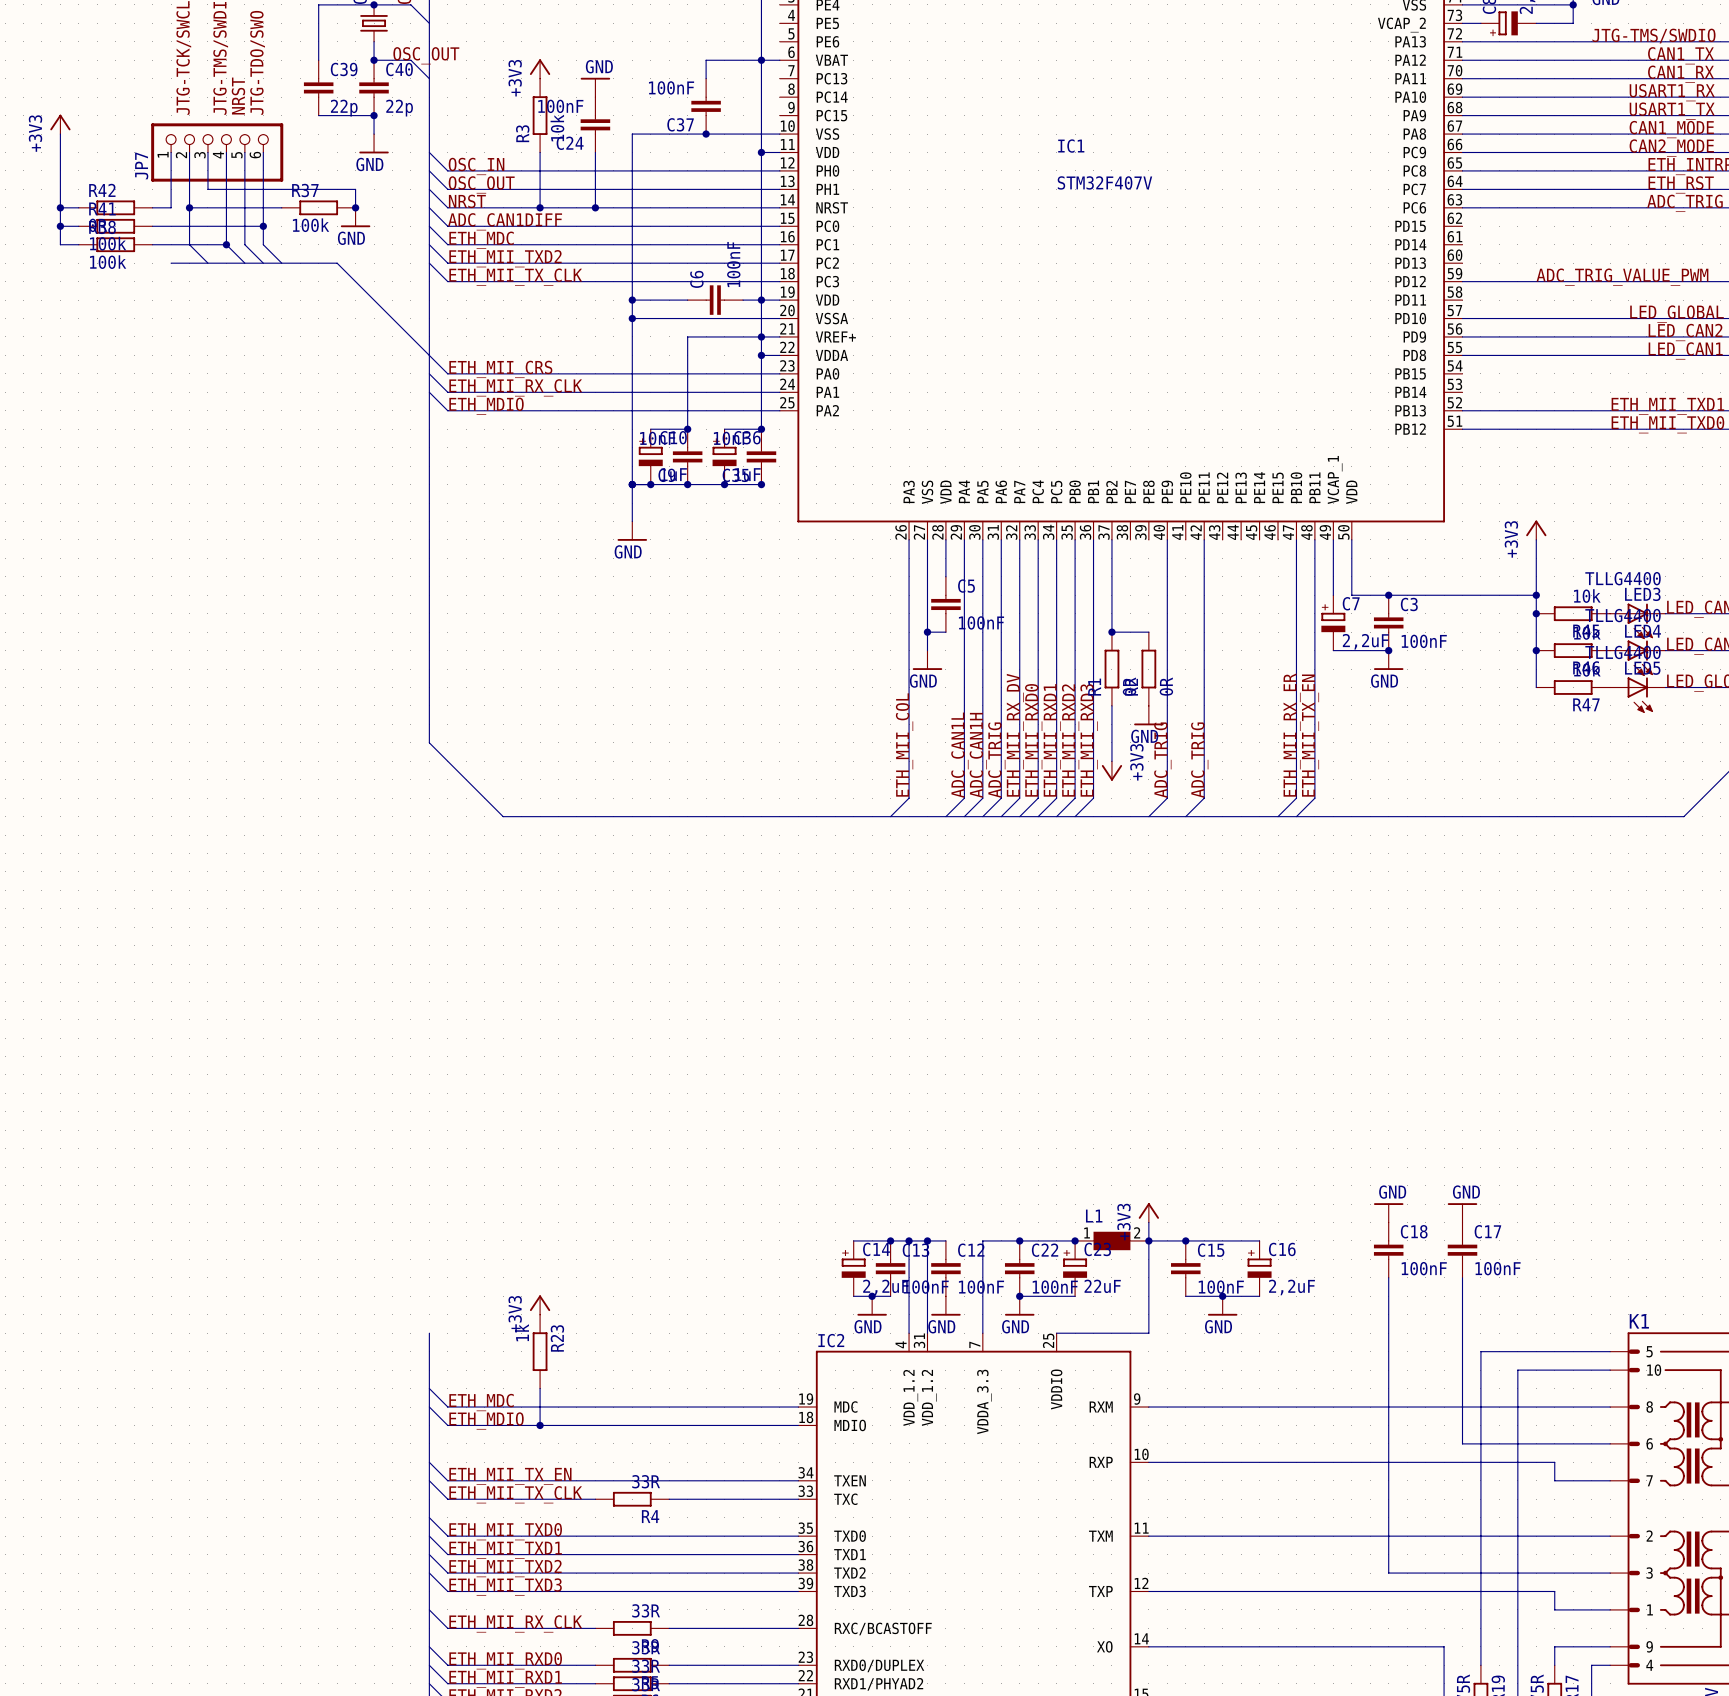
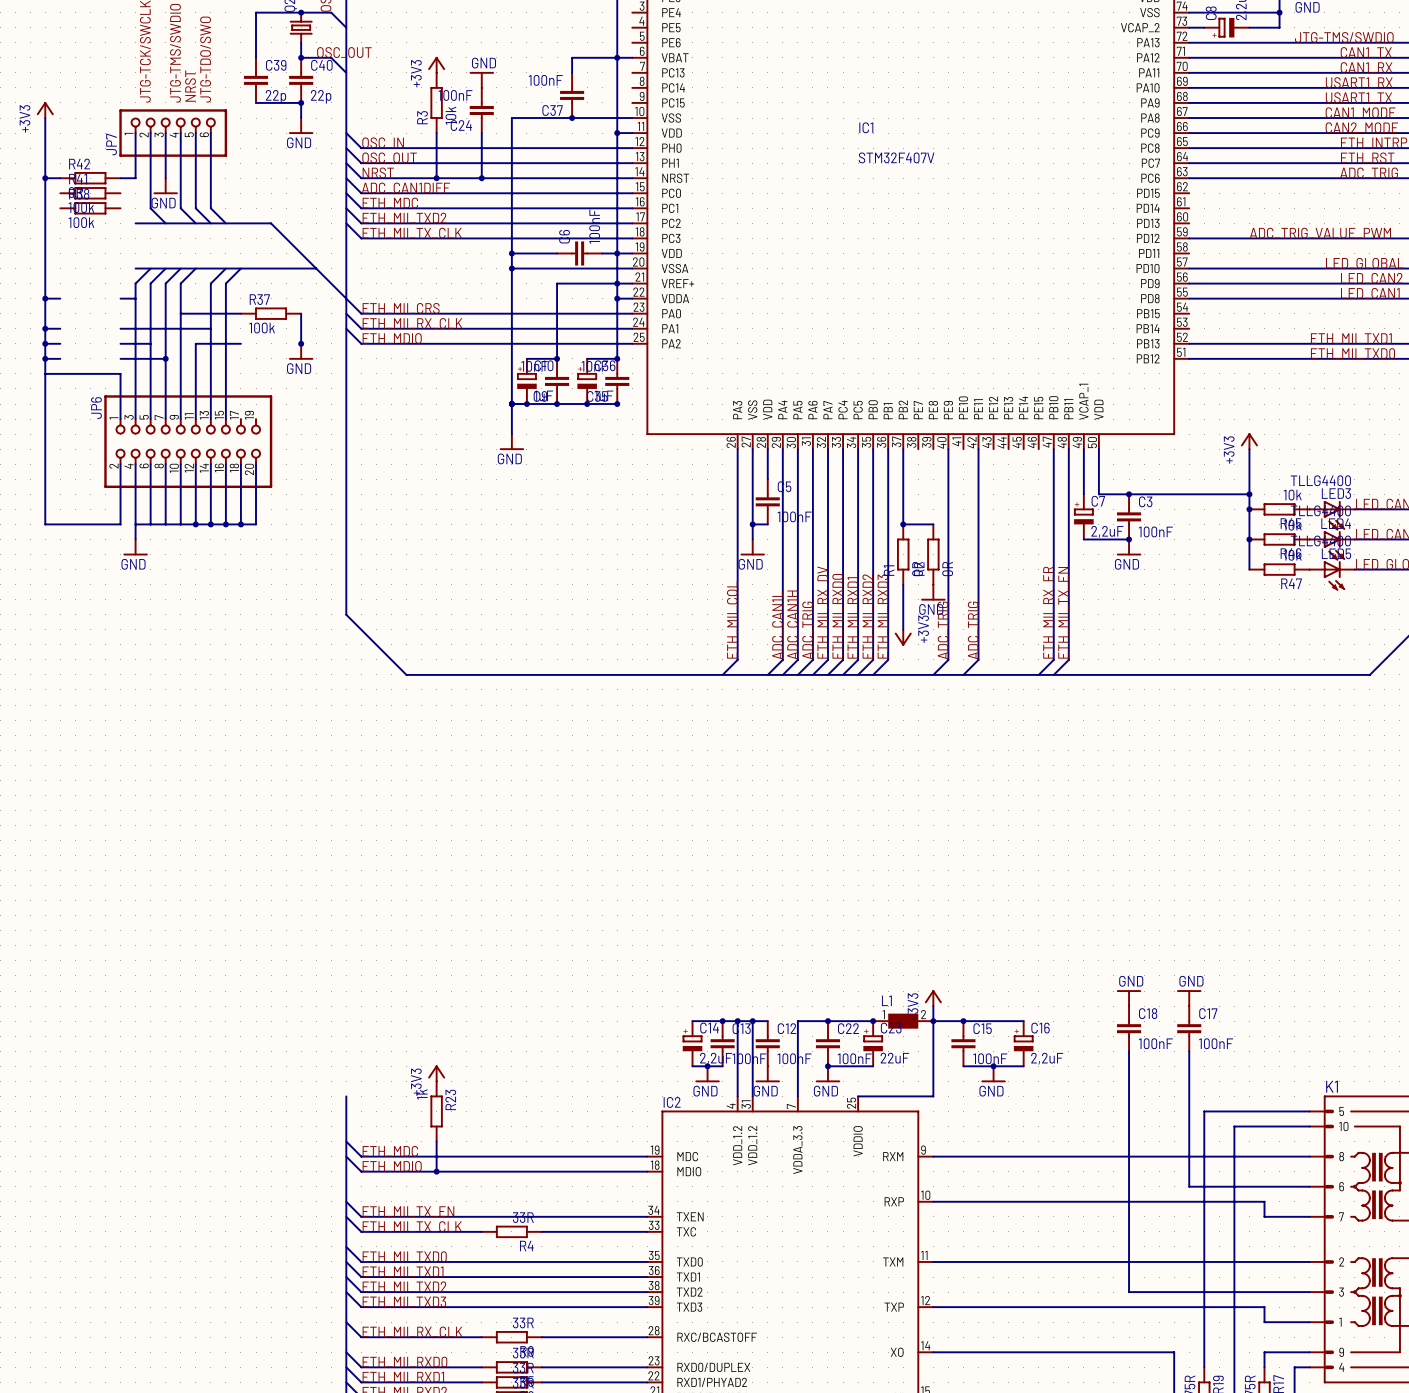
wire: (207, 189) (355, 189) (355, 207) -> (165, 163) (165, 178)
wire: (189, 207) (281, 207) -> none
junction: (189, 207) -> none
R37 position: (318, 207) -> (271, 313)
junction: (355, 207) -> none
power symbol: none -> GND (165, 186)
power symbol: GND (355, 217) -> none
wire: (60, 226) (78, 226) -> (45, 328) (60, 328)
junction: (60, 226) -> none
wire: (152, 226) (263, 226) -> (120, 328) (210, 328)
junction: (263, 226) -> none
wire: (60, 244) (78, 244) -> (45, 208) (45, 524) (120, 524) (120, 464)
wire: (152, 244) (226, 244) -> (180, 313) (240, 313)
junction: (226, 244) -> none
bus: none -> (135, 268) (316, 268)
wire: none -> (150, 268) (135, 283) (135, 419)
wire: none -> (165, 268) (150, 283) (150, 419)
wire: none -> (180, 268) (165, 283) (165, 419)
wire: none -> (195, 268) (180, 283) (180, 419)
wire: none -> (225, 268) (210, 283) (210, 419)
wire: none -> (240, 268) (225, 283) (225, 419)
wire: none -> (45, 298) (60, 298)
junction: none -> (45, 298)
wire: none -> (120, 298) (135, 298)
wire: none -> (301, 313) (301, 343)
junction: none -> (45, 328)
wire: none -> (45, 343) (60, 343)
junction: none -> (45, 343)
wire: none -> (120, 343) (150, 343)
wire: none -> (240, 343) (195, 343) (195, 419)
junction: none -> (301, 343)
power symbol: none -> GND (301, 351)
wire: none -> (45, 358) (60, 358)
junction: none -> (45, 358)
wire: none -> (120, 358) (165, 358)
junction: none -> (165, 358)
wire: none -> (45, 373) (120, 373) (120, 419)
JP6: none -> (188, 441)
wire: none -> (135, 464) (135, 539)
wire: none -> (150, 464) (150, 524)
wire: none -> (165, 464) (165, 524)
wire: none -> (180, 464) (180, 524)
wire: none -> (195, 464) (195, 524)
wire: none -> (210, 464) (210, 524)
wire: none -> (225, 464) (225, 524)
wire: none -> (240, 464) (240, 524)
wire: none -> (256, 464) (256, 524) (135, 524)
junction: none -> (195, 524)
junction: none -> (210, 524)
junction: none -> (225, 524)
junction: none -> (240, 524)
power symbol: none -> GND (135, 547)

